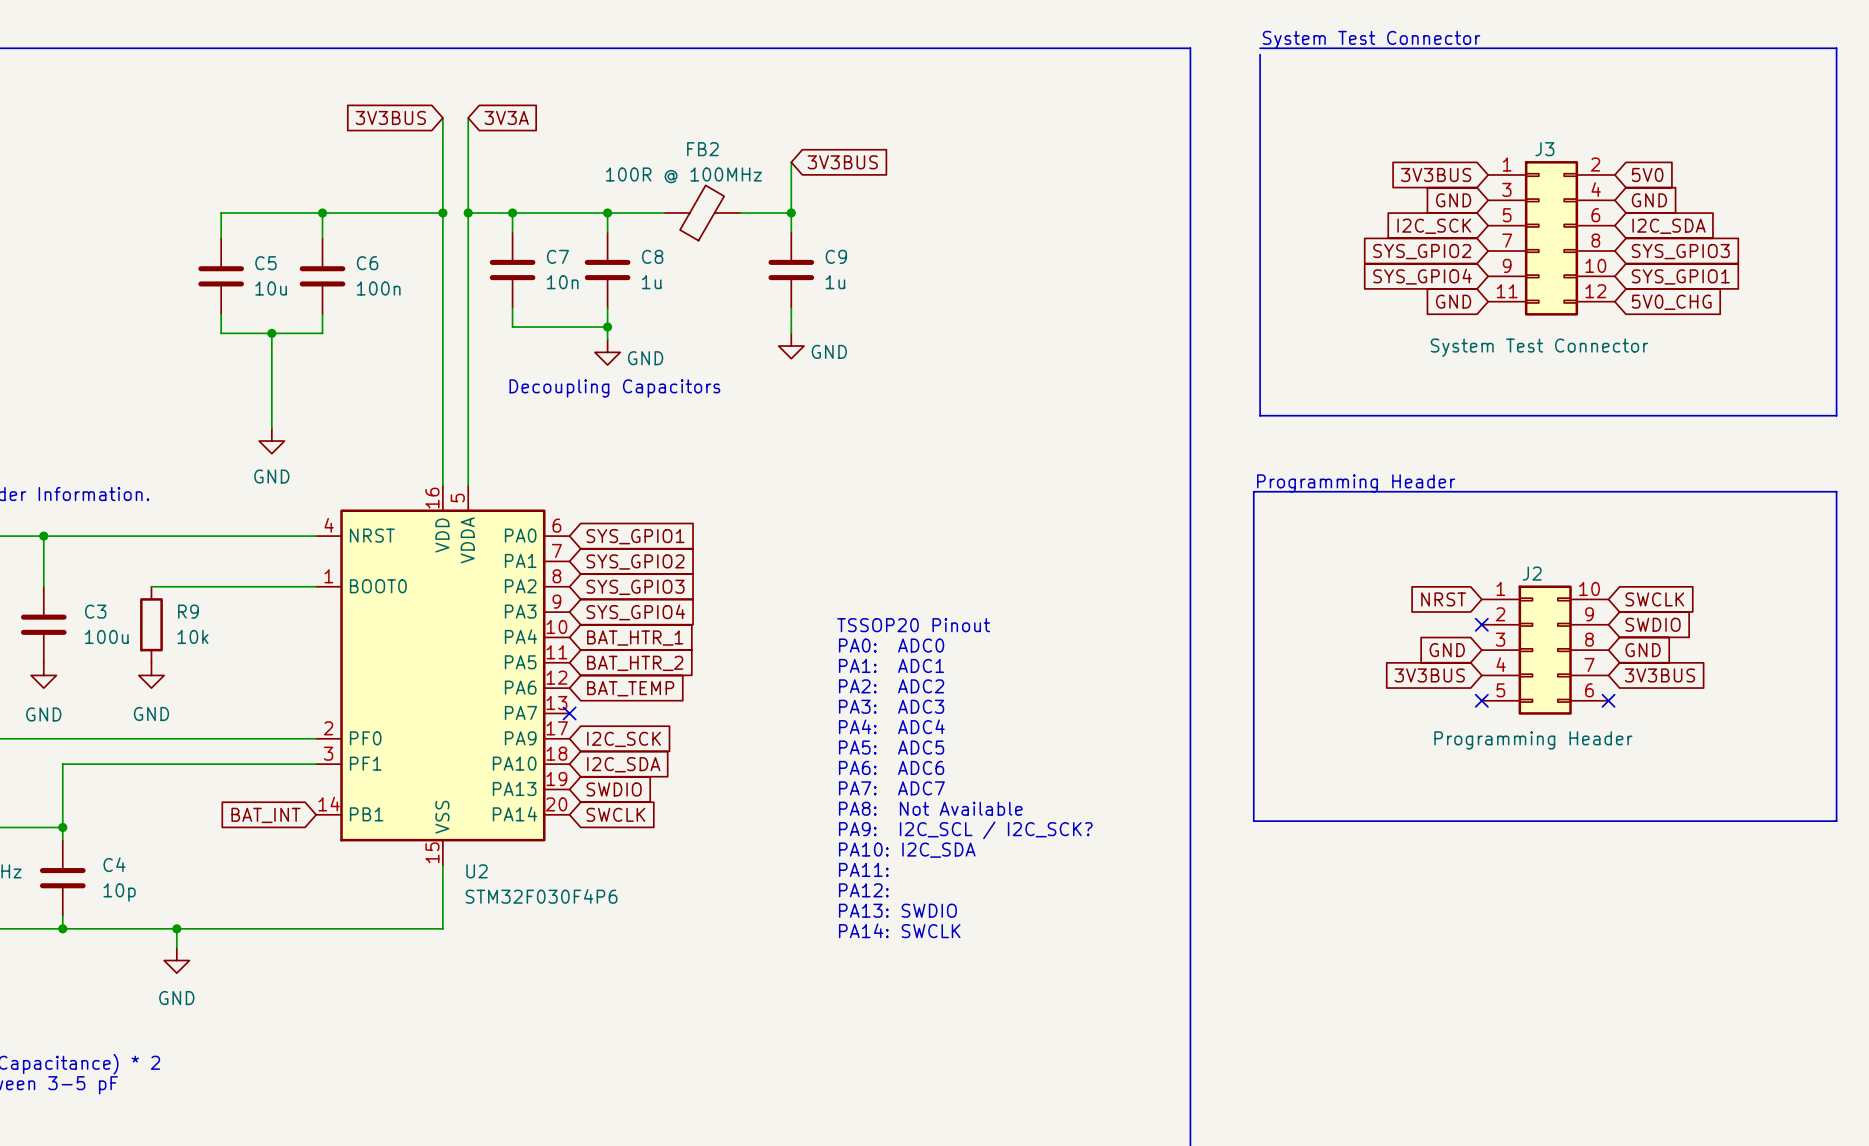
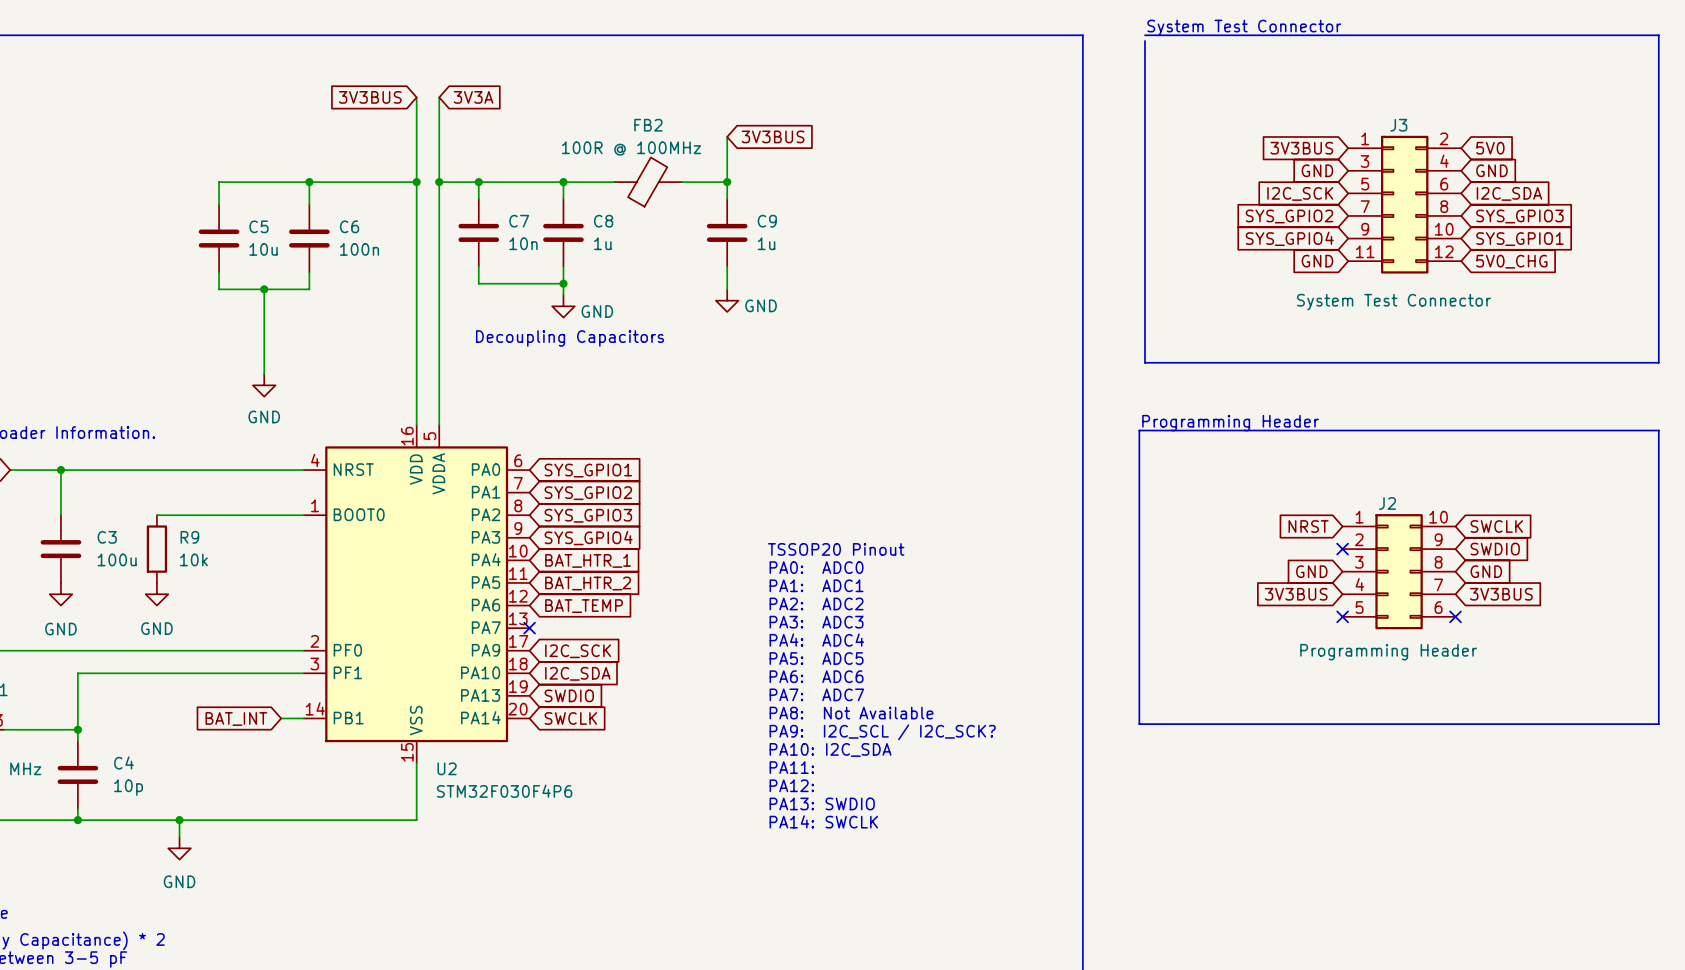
wire: none -> (281, 718) (303, 718)
global label position: BAT_INT (265, 815) -> BAT_INT (236, 719)

